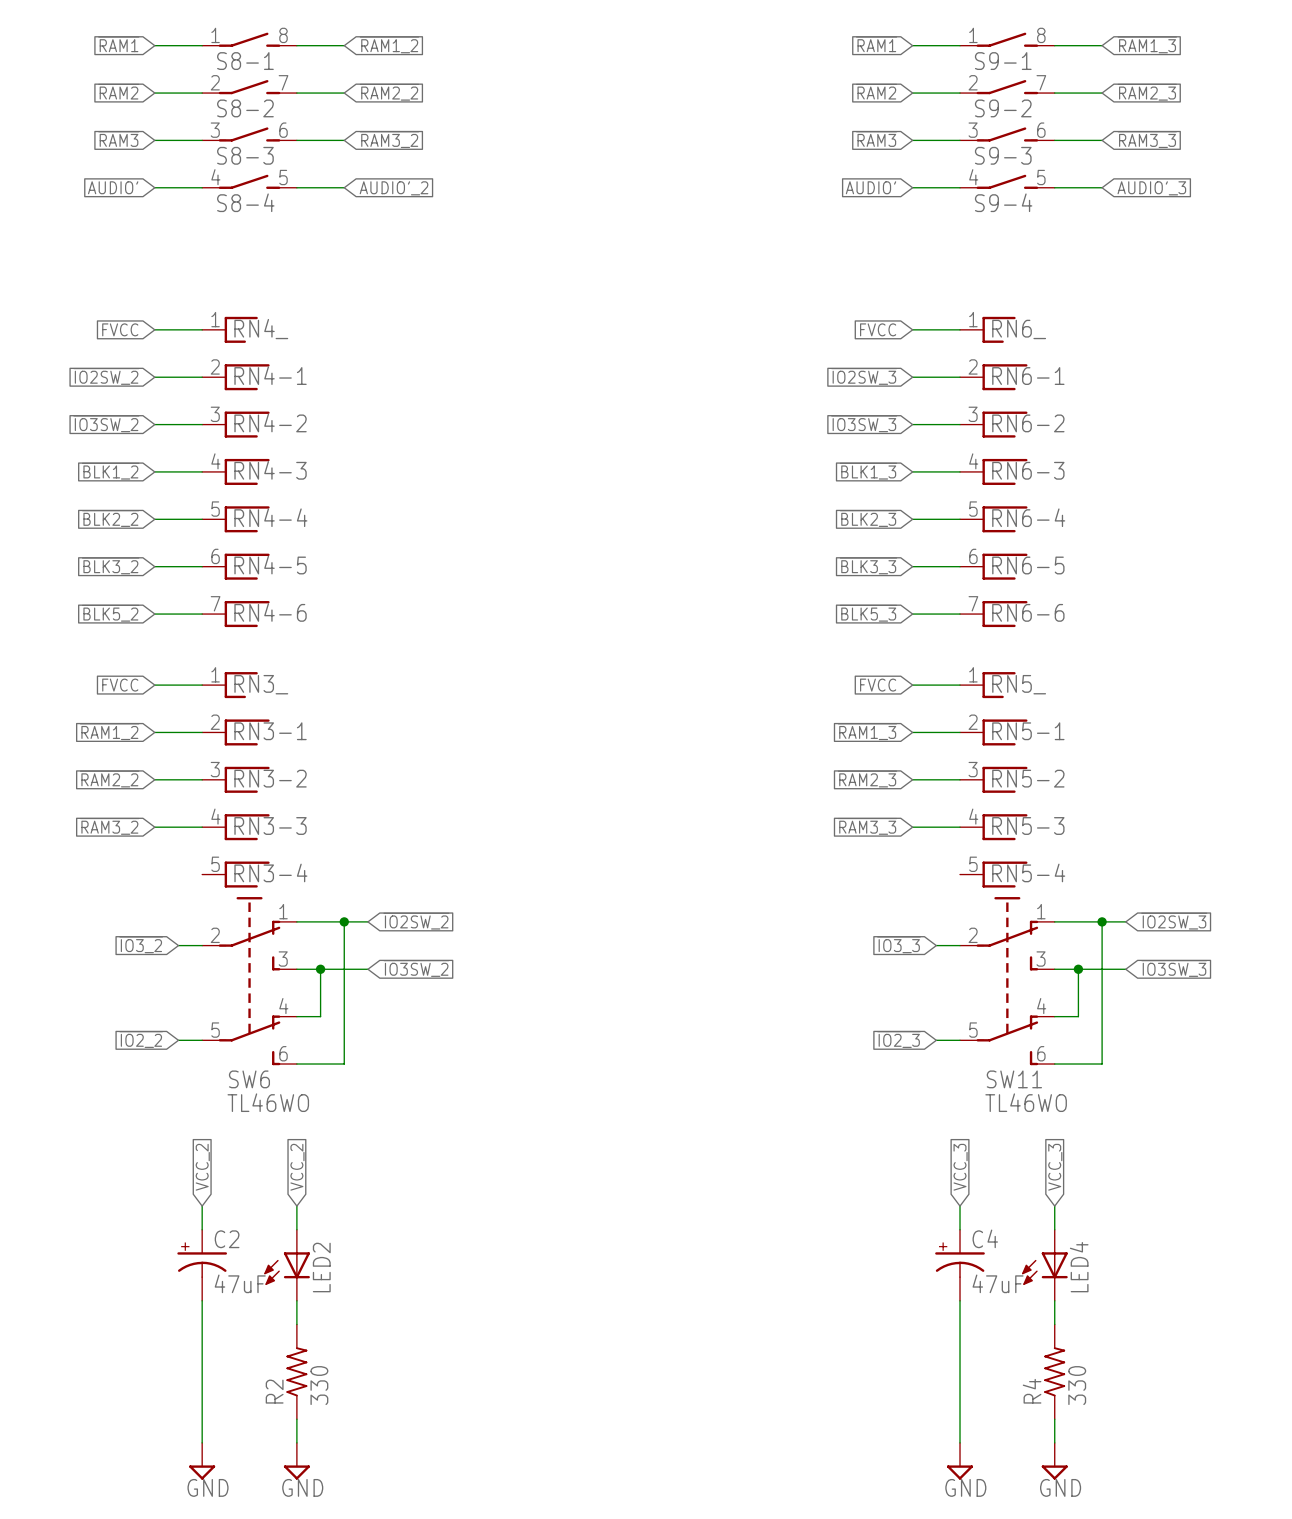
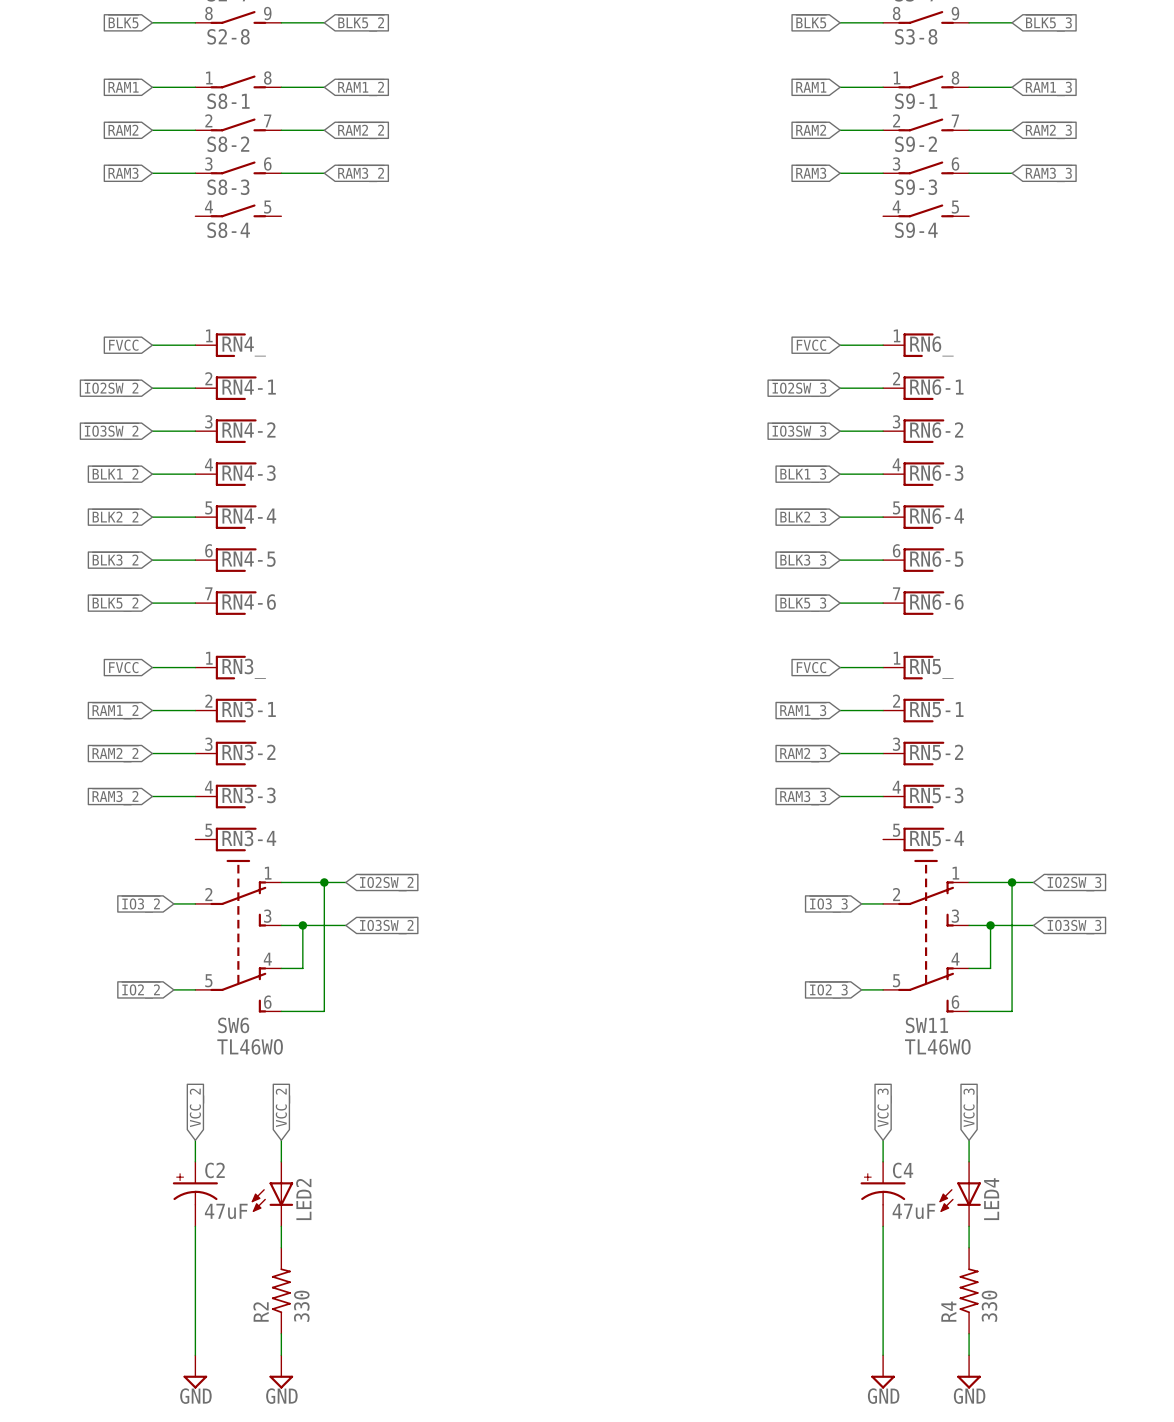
global label: AUDIO' (113, 187) -> none
wire: (154, 187) (202, 187) -> none
wire: (296, 187) (344, 187) -> none
global label: AUDIO' (871, 187) -> none
wire: (912, 187) (960, 187) -> none
wire: (1054, 187) (1102, 187) -> none
global label: AUDIO'_2 (394, 188) -> none
global label: AUDIO'_3 (1151, 188) -> none

